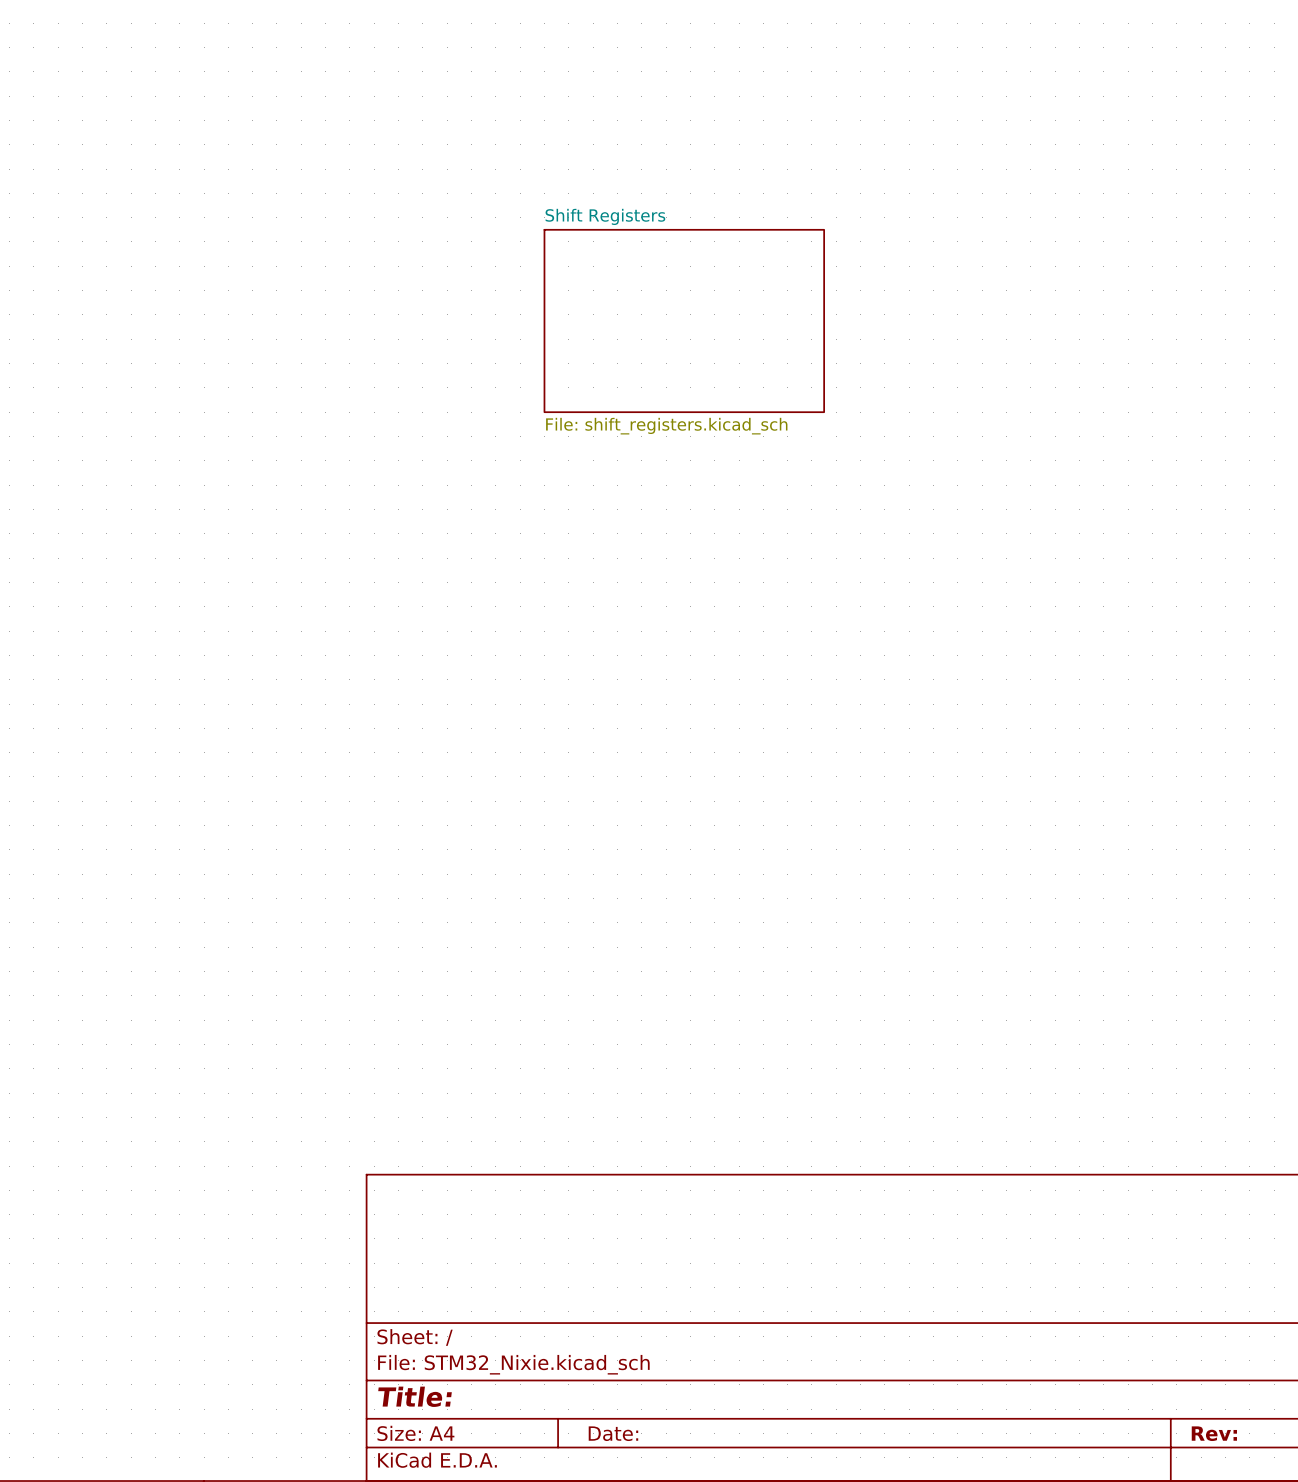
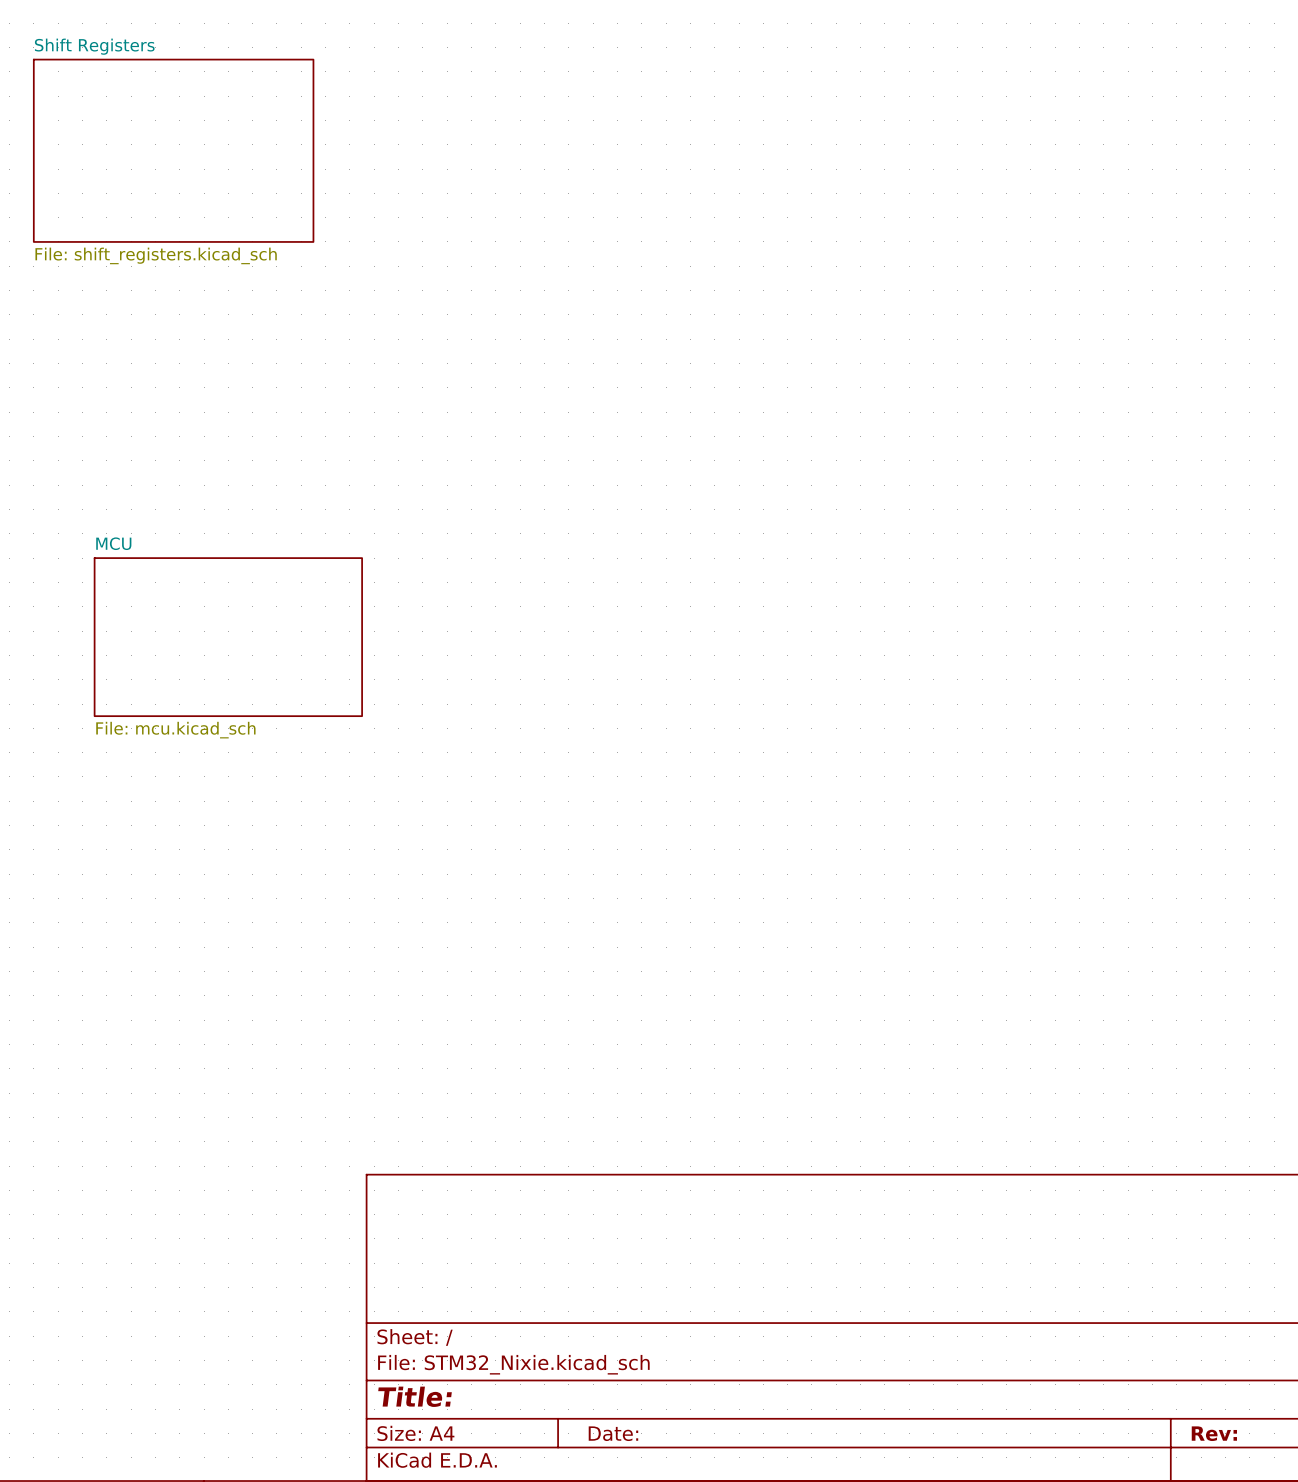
sheet Shift Registers: none -> File: shift_registers.kicad_sch (173, 150)
sheet Shift Registers: File: shift_registers.kicad_sch (684, 320) -> none
sheet MCU: none -> File: mcu.kicad_sch (228, 637)

